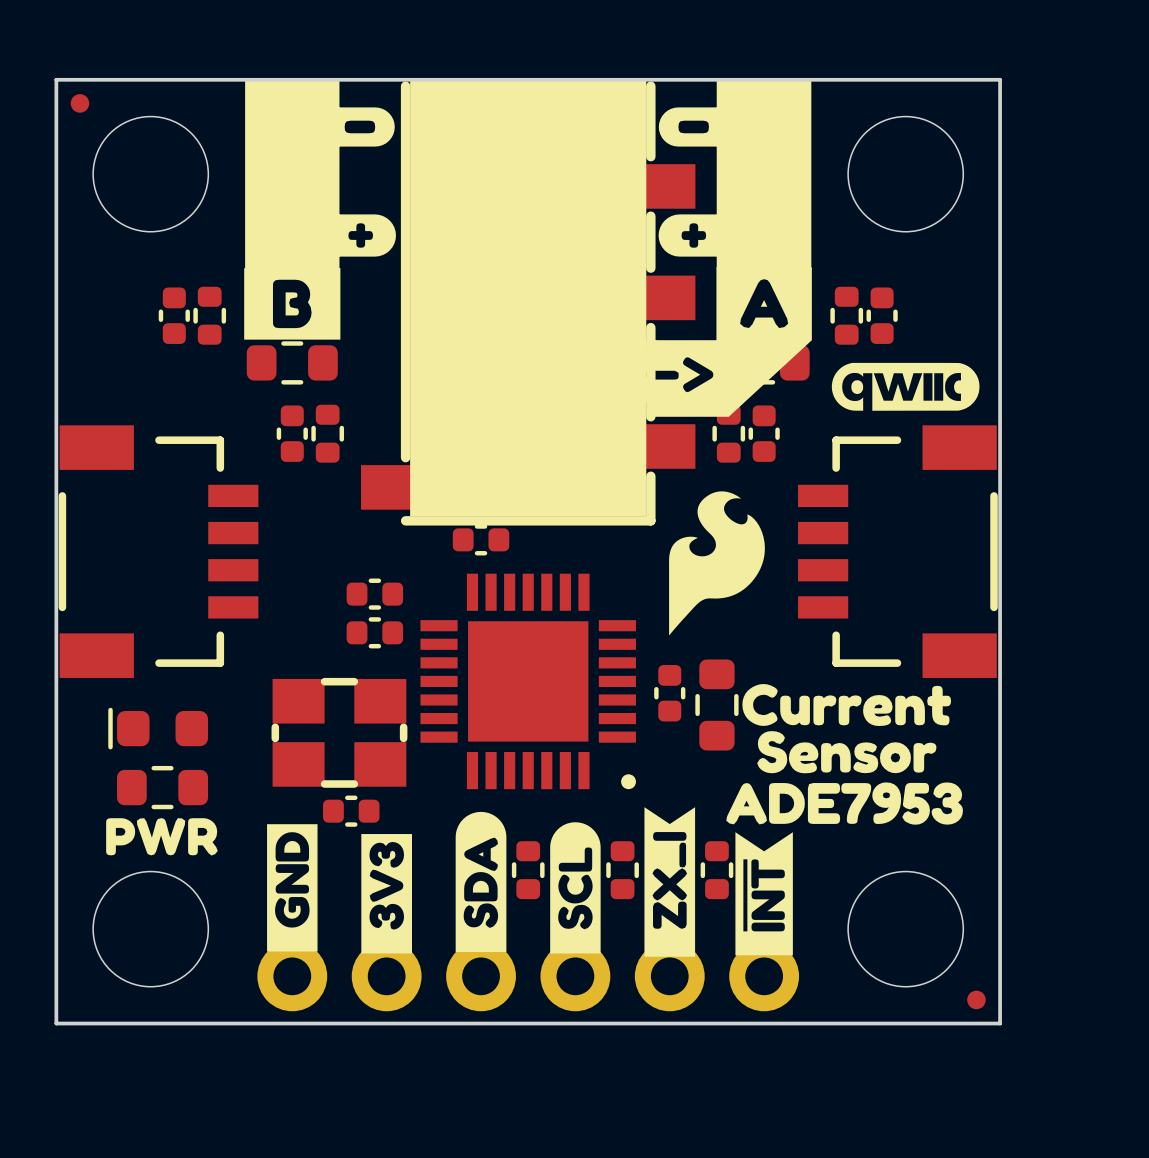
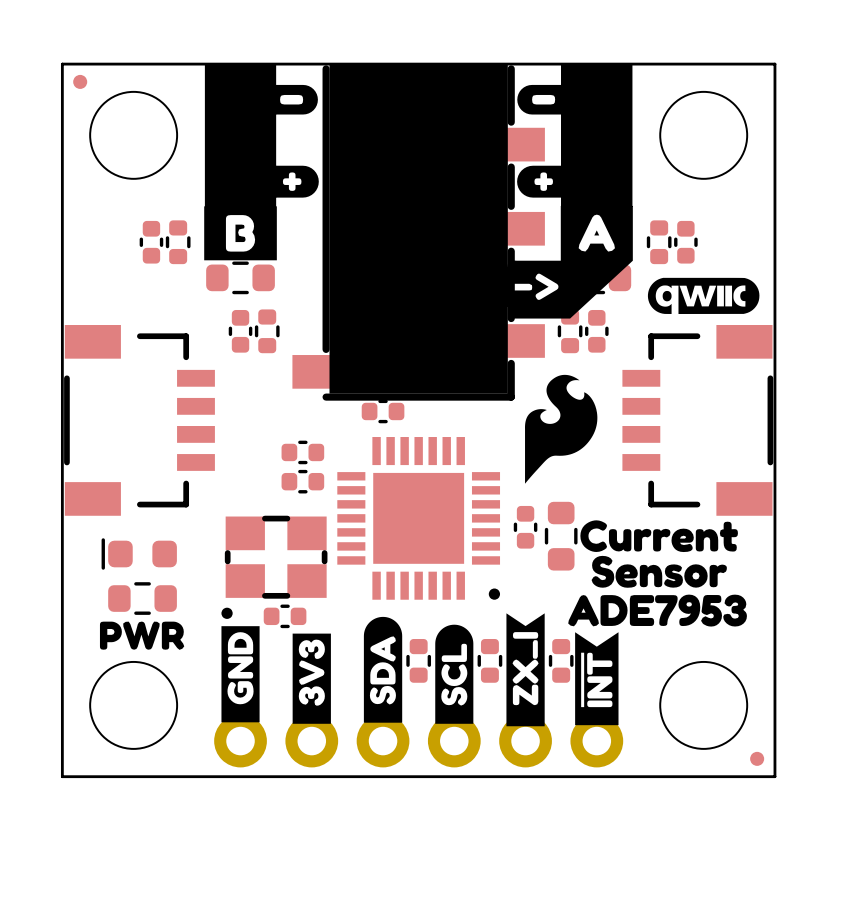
part footprint: [271, 677, 408, 788] -> [221, 515, 328, 619]

